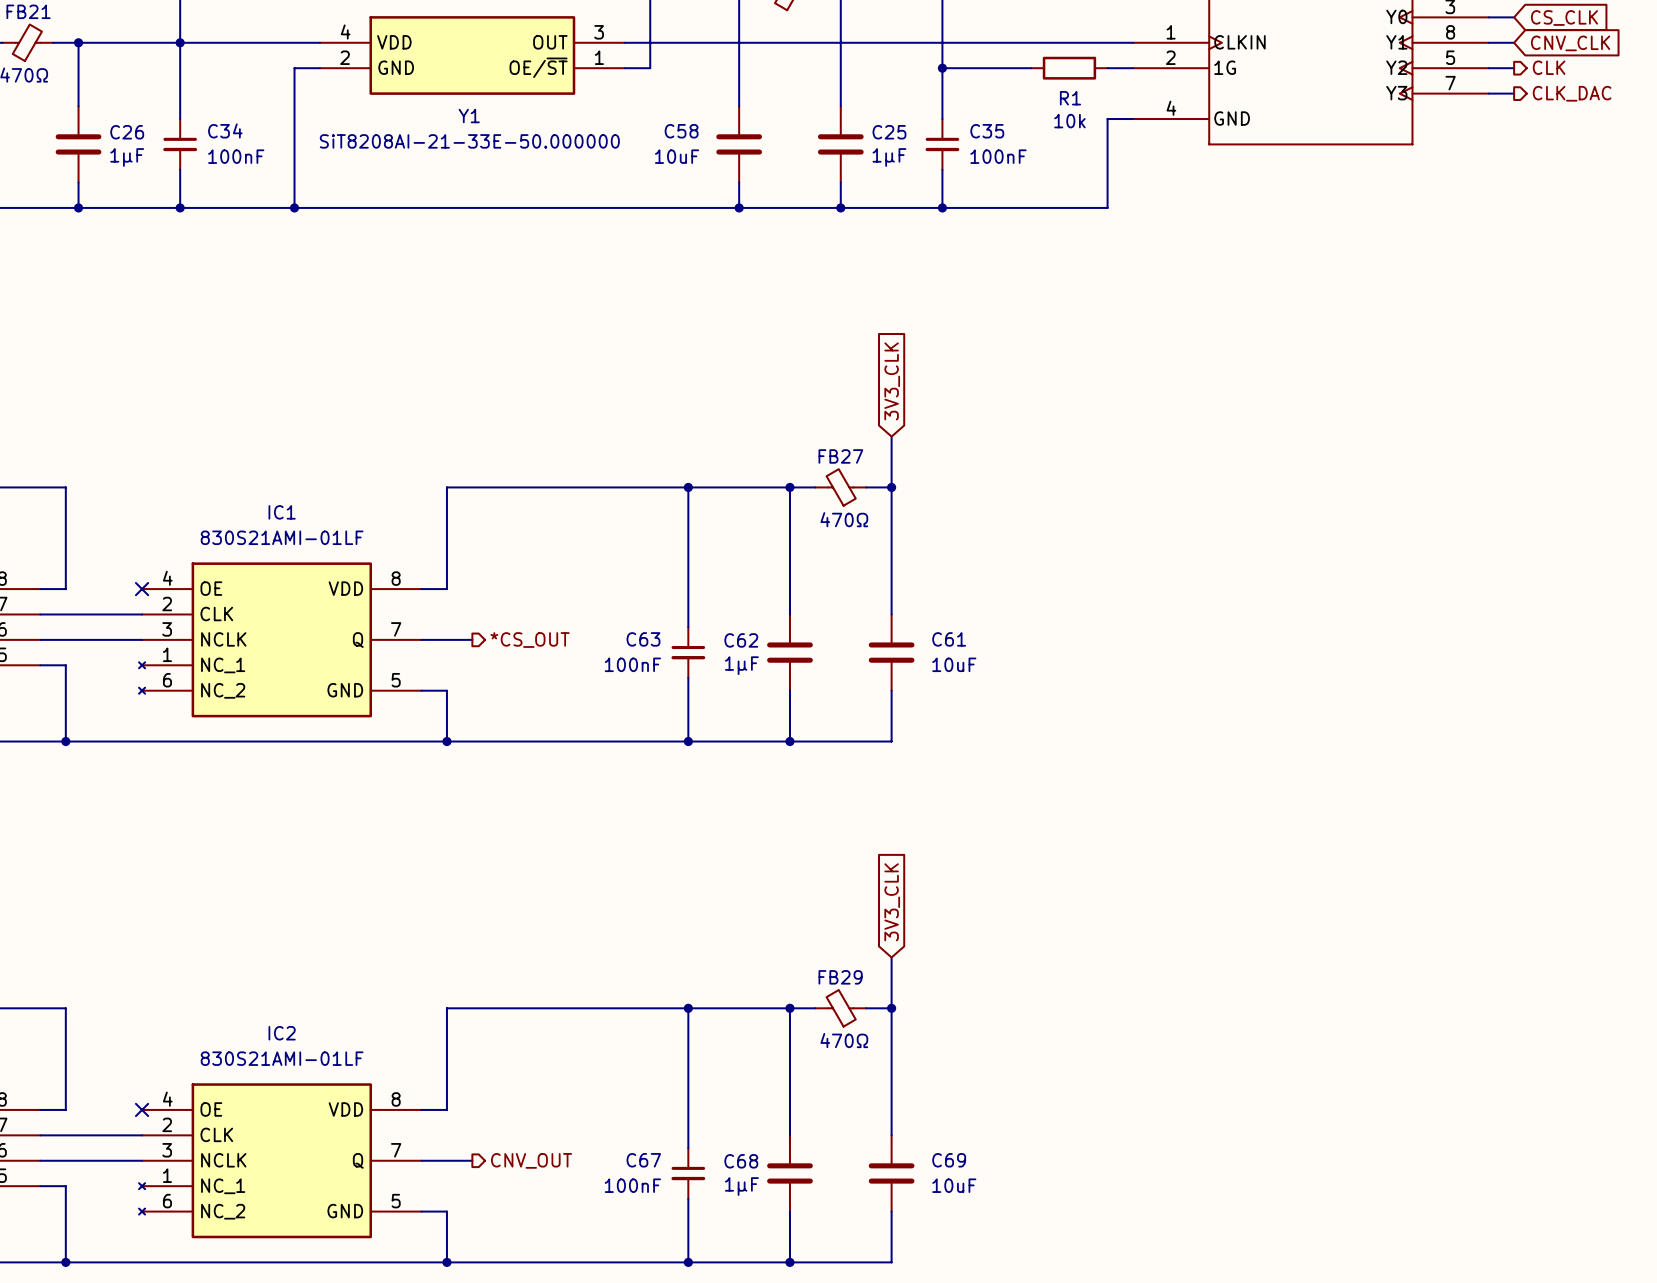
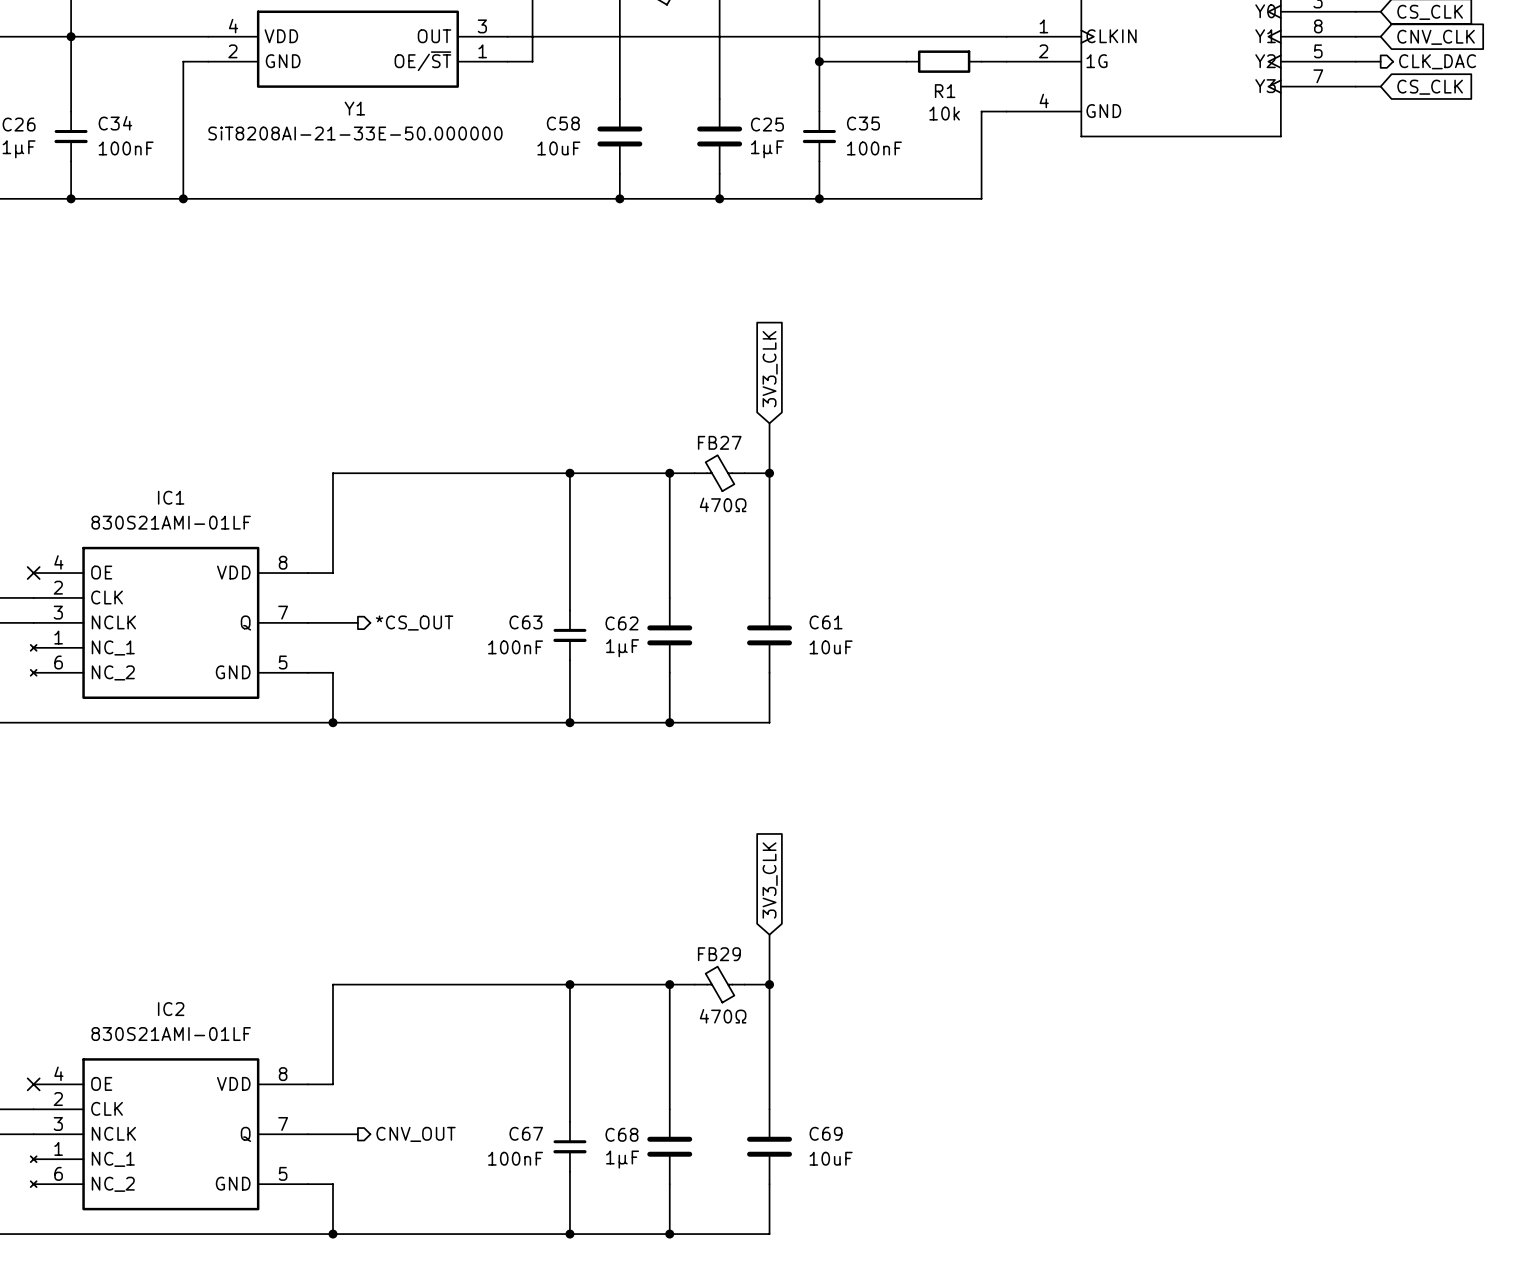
hierarchical label: CLK (1549, 67) -> CLK_DAC (1437, 61)
hierarchical label: CLK_DAC (1572, 93) -> none
global label: none -> CS_CLK (1430, 87)

